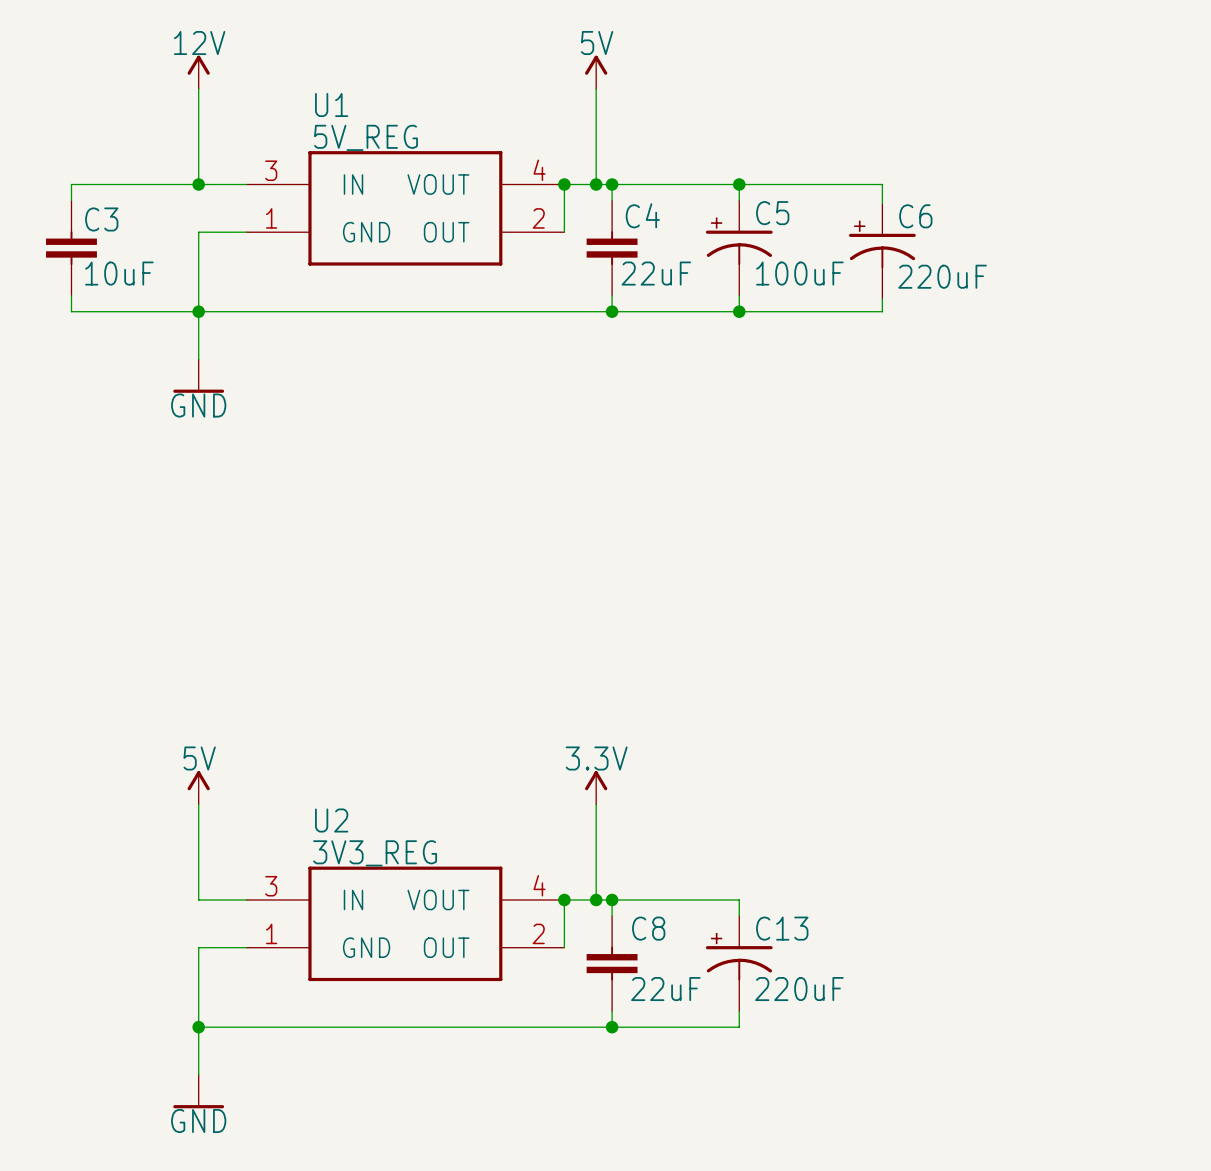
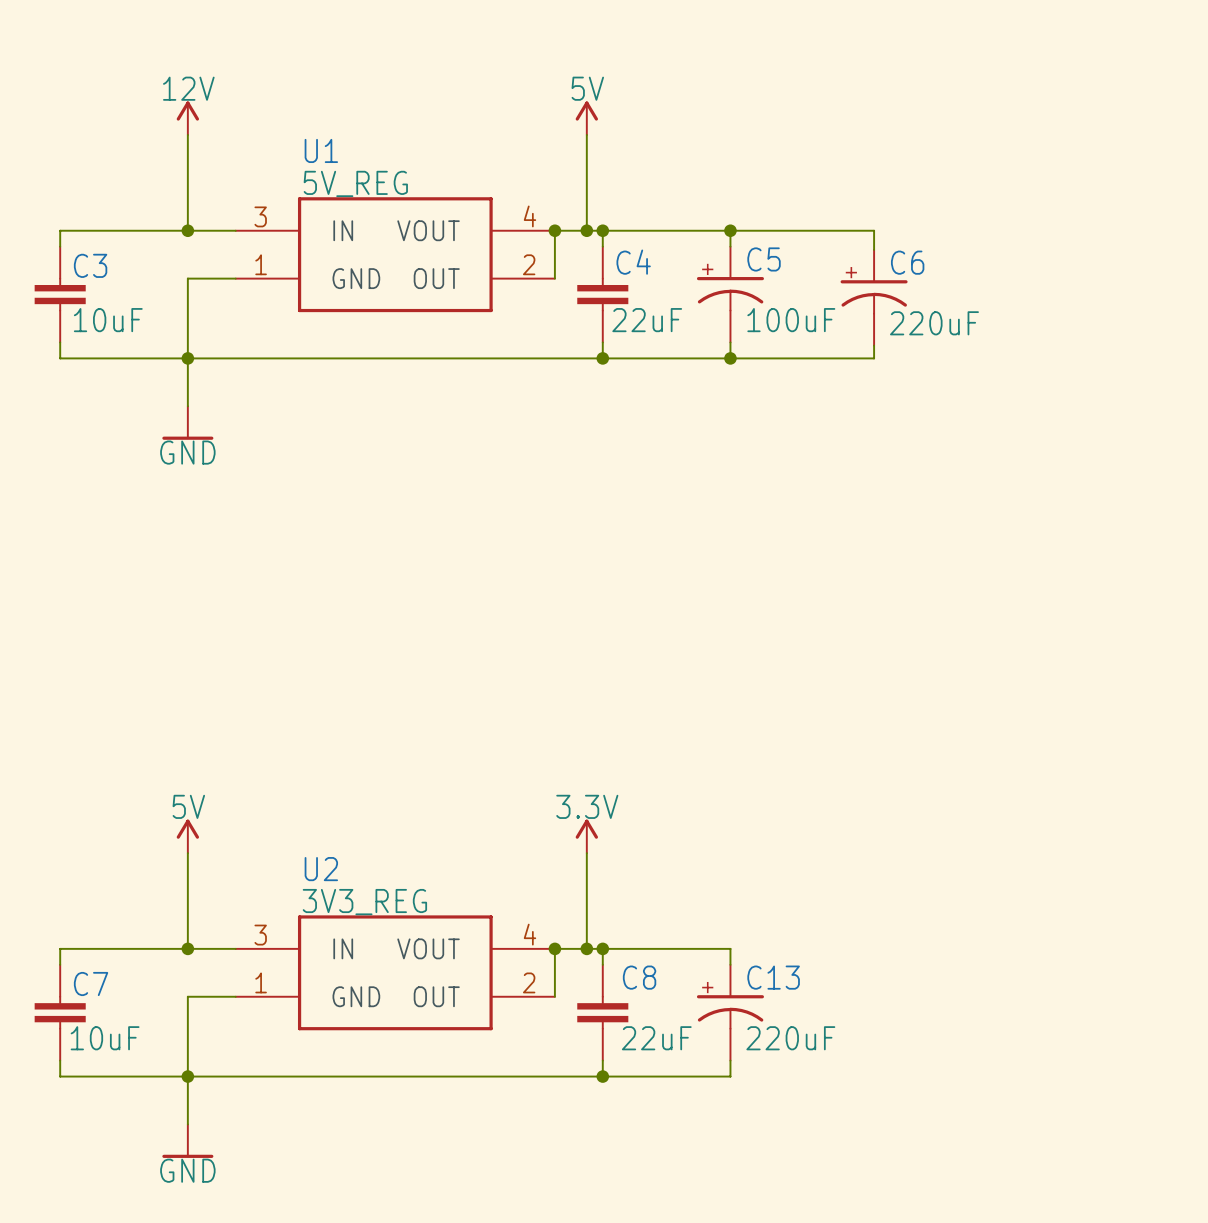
wire: none -> (187, 948) (60, 948) (60, 964)
junction: none -> (187, 948)
C7: none -> 10uF (60, 1012)
wire: none -> (60, 1060) (60, 1076) (187, 1076)

